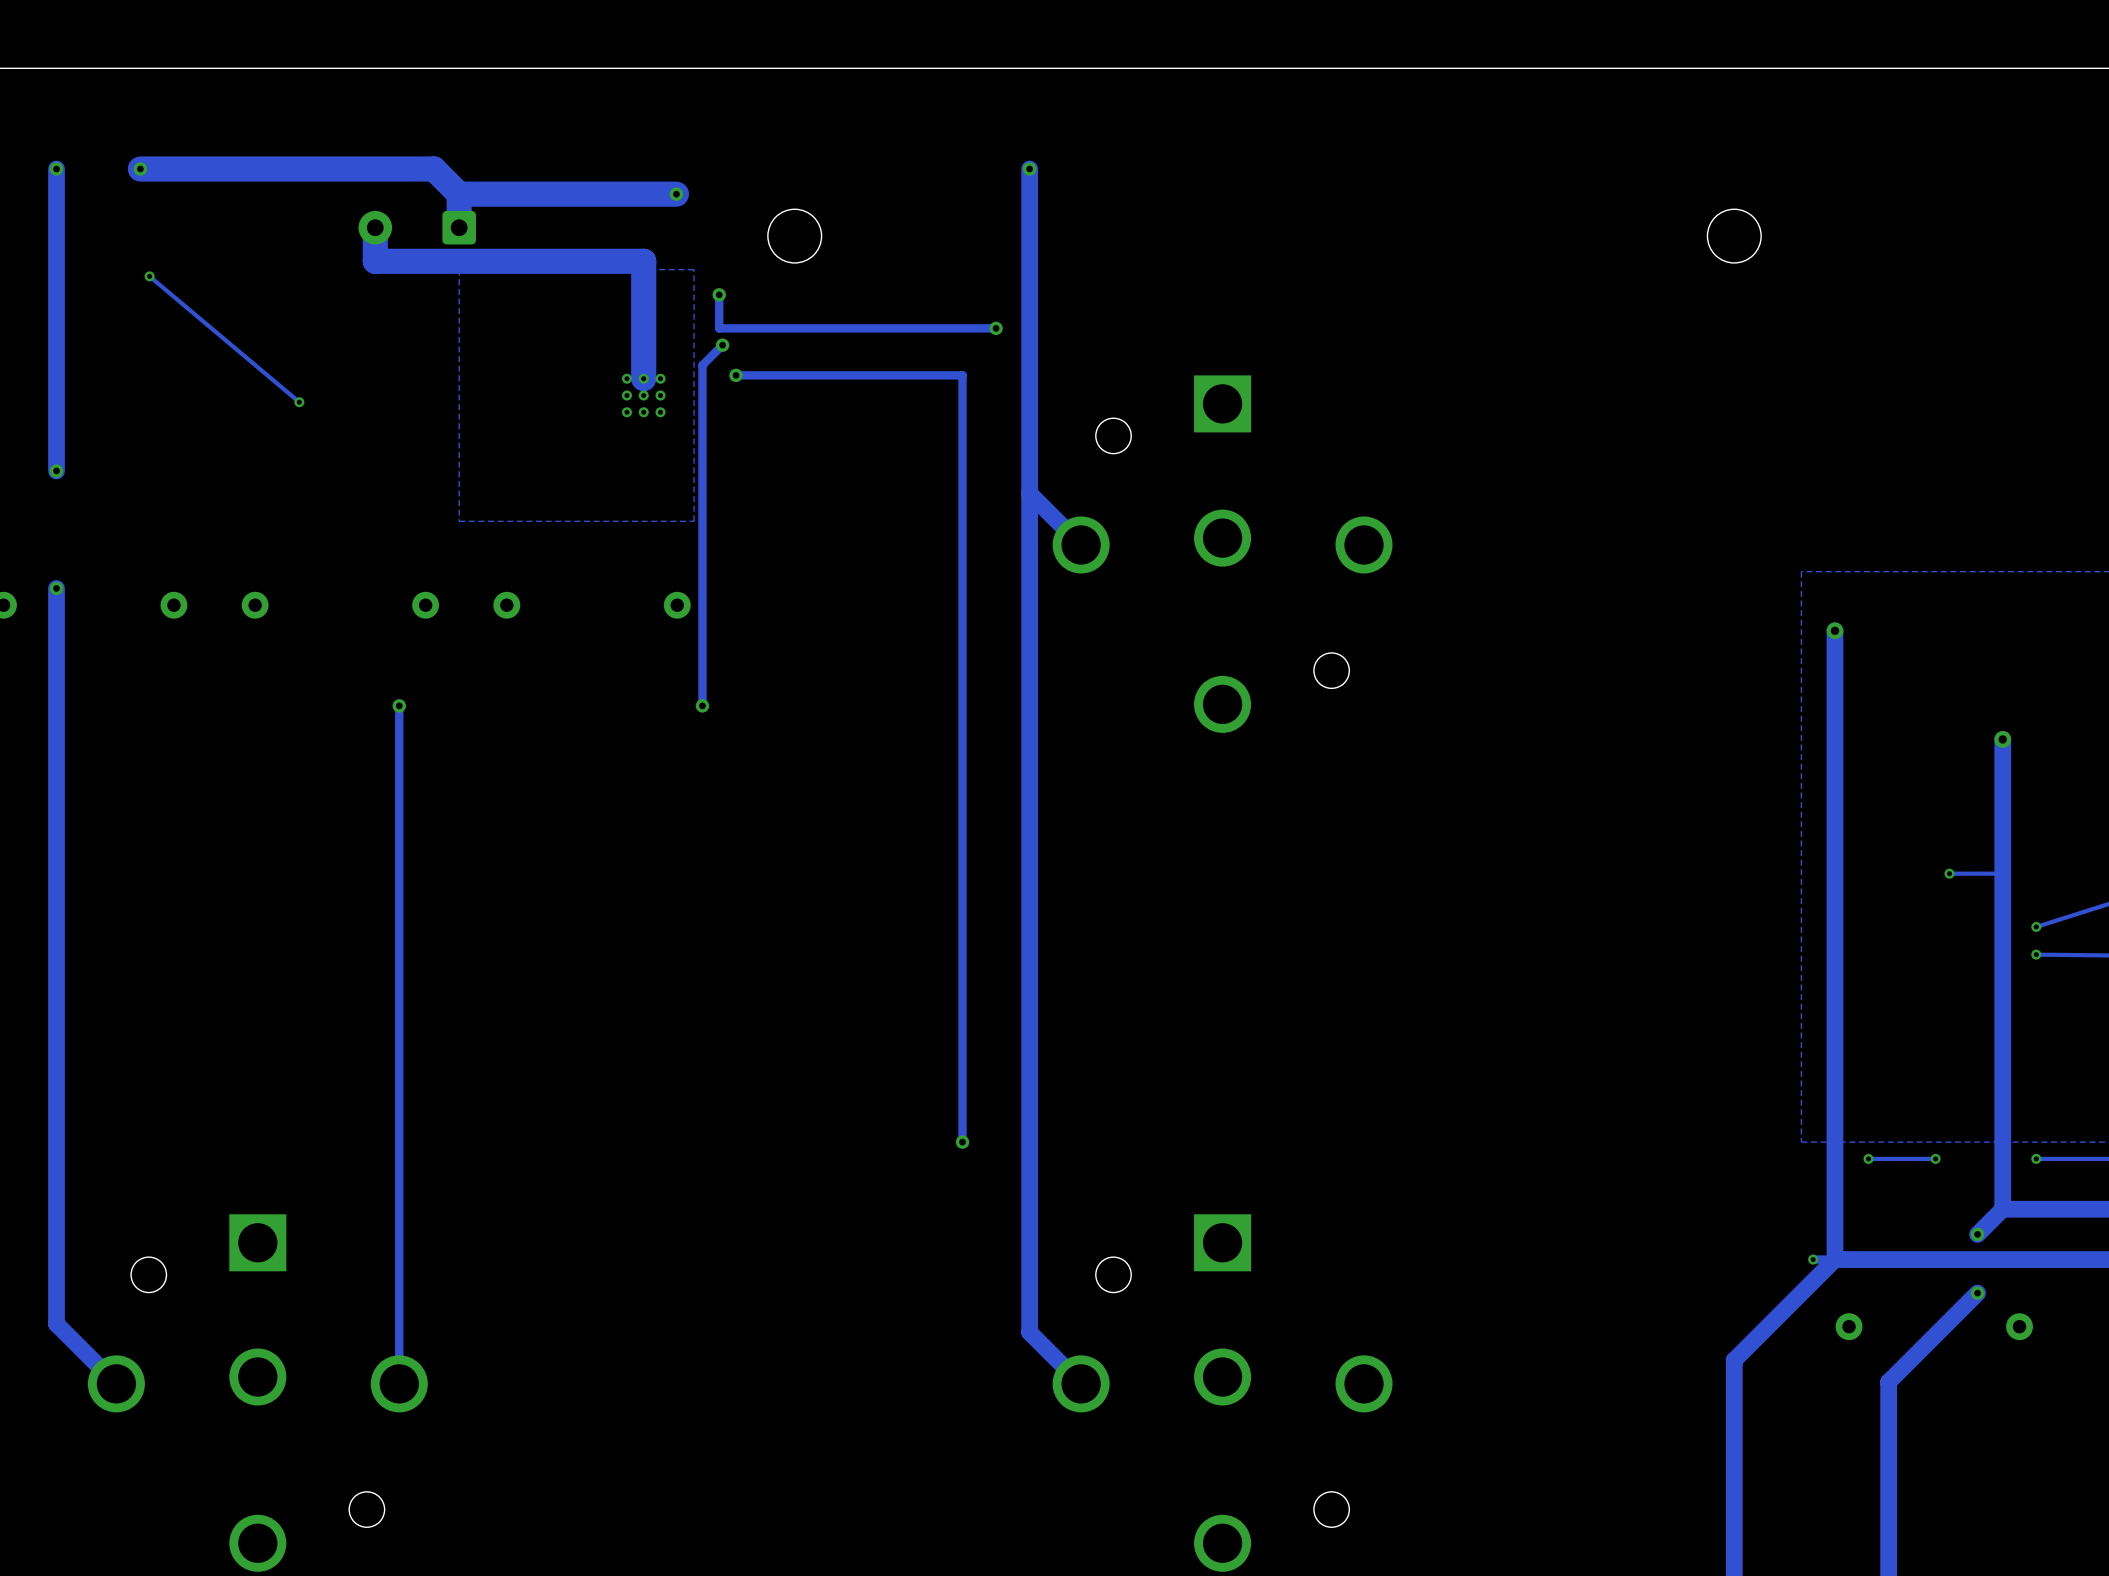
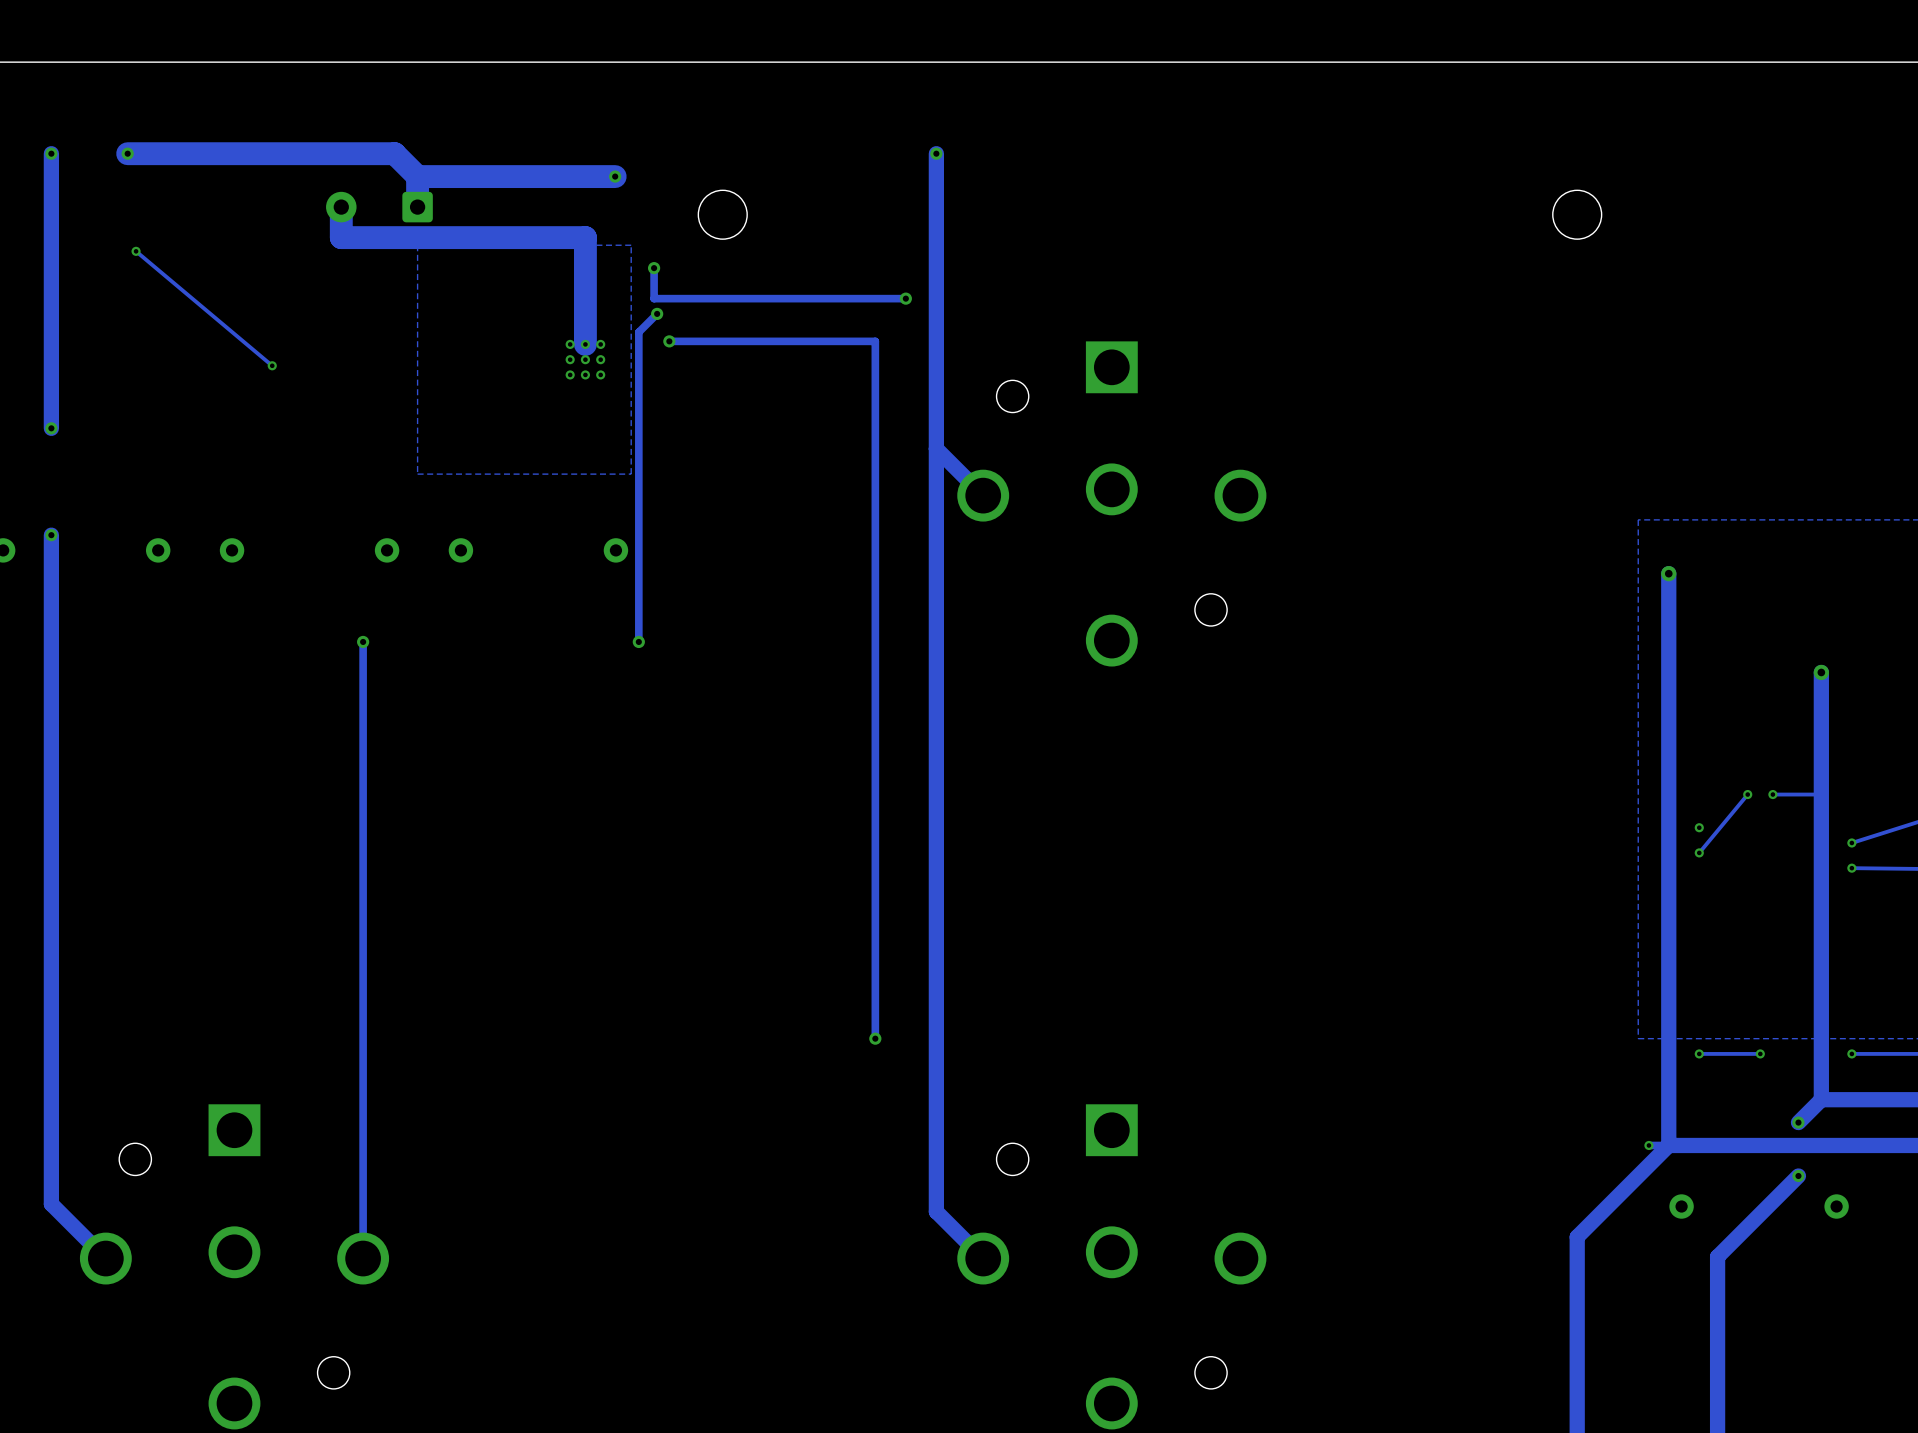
track: none -> (1747, 794) (1699, 852)
via: none -> (1747, 794)
via: none -> (1699, 827)
via: none -> (1699, 852)

